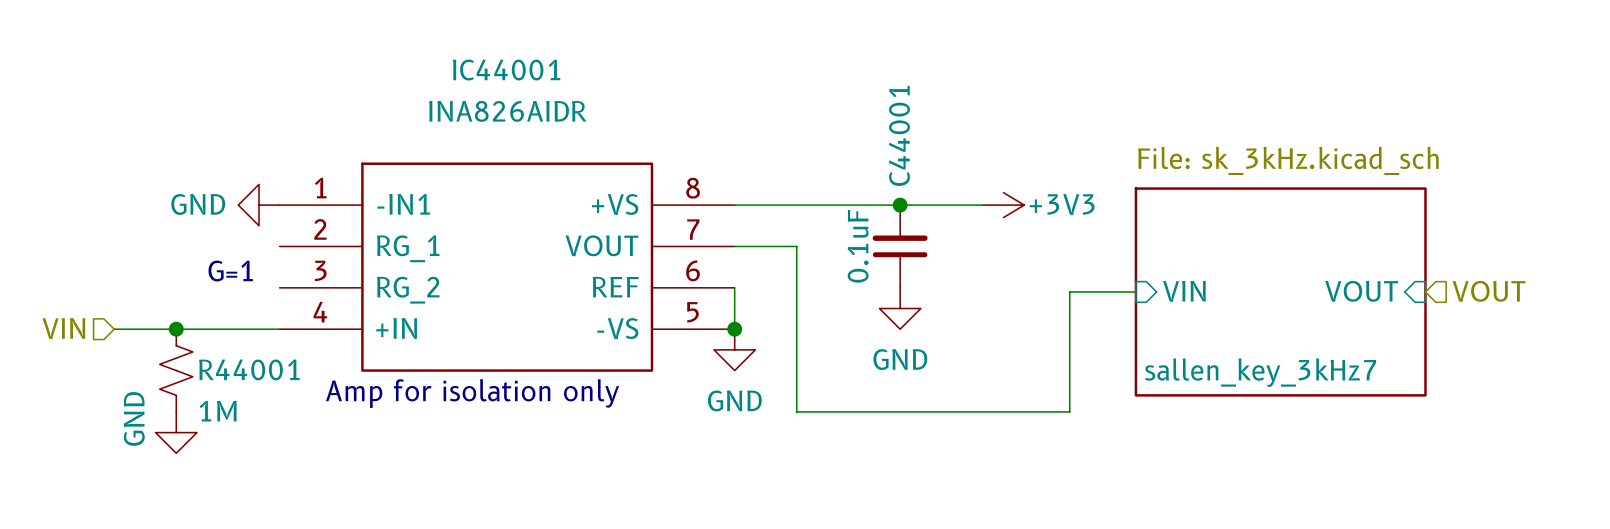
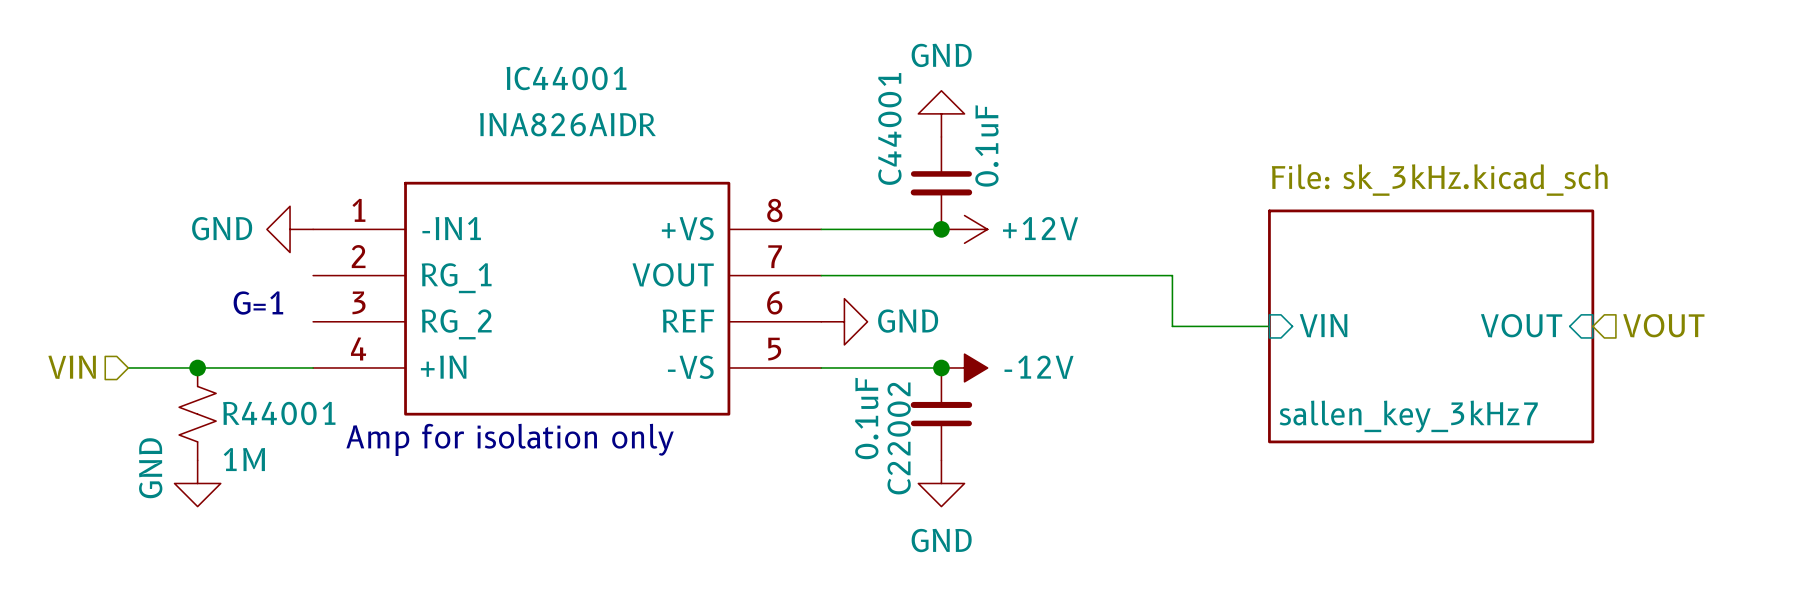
power symbol: none -> GND (941, 113)
C44001 name position: C44001 (899, 135) -> C44001 (889, 128)
wire: (842, 205) (982, 205) -> none
power symbol: none -> +12V (964, 229)
junction position: (900, 205) -> (941, 229)
power symbol: +3V3 (1003, 205) -> none
wire: (796, 246) (796, 411) (1069, 411) (1069, 291) -> (890, 275) (1172, 275) (1172, 326) (1195, 326)
C44001 value position: 0.1uF (858, 246) -> 0.1uF (986, 145)
C44001 rotation: 0° (900, 246) -> 180° (941, 183)
C44001 position: (900, 246) -> (941, 183)
wire: (734, 287) (734, 329) -> (941, 367) (821, 367)
power symbol: GND (900, 308) -> none
junction: (734, 329) -> none
junction: none -> (941, 367)
power symbol: none -> -12V (964, 367)
power symbol rotation: 0° (734, 349) -> 90° counterclockwise (844, 321)
power symbol position: GND (734, 349) -> GND (844, 321)
C22002: none -> 0.1uF (941, 414)
text position: Amp for isolation only (472, 393) -> Amp for isolation only (510, 439)
power symbol: none -> GND (941, 483)

